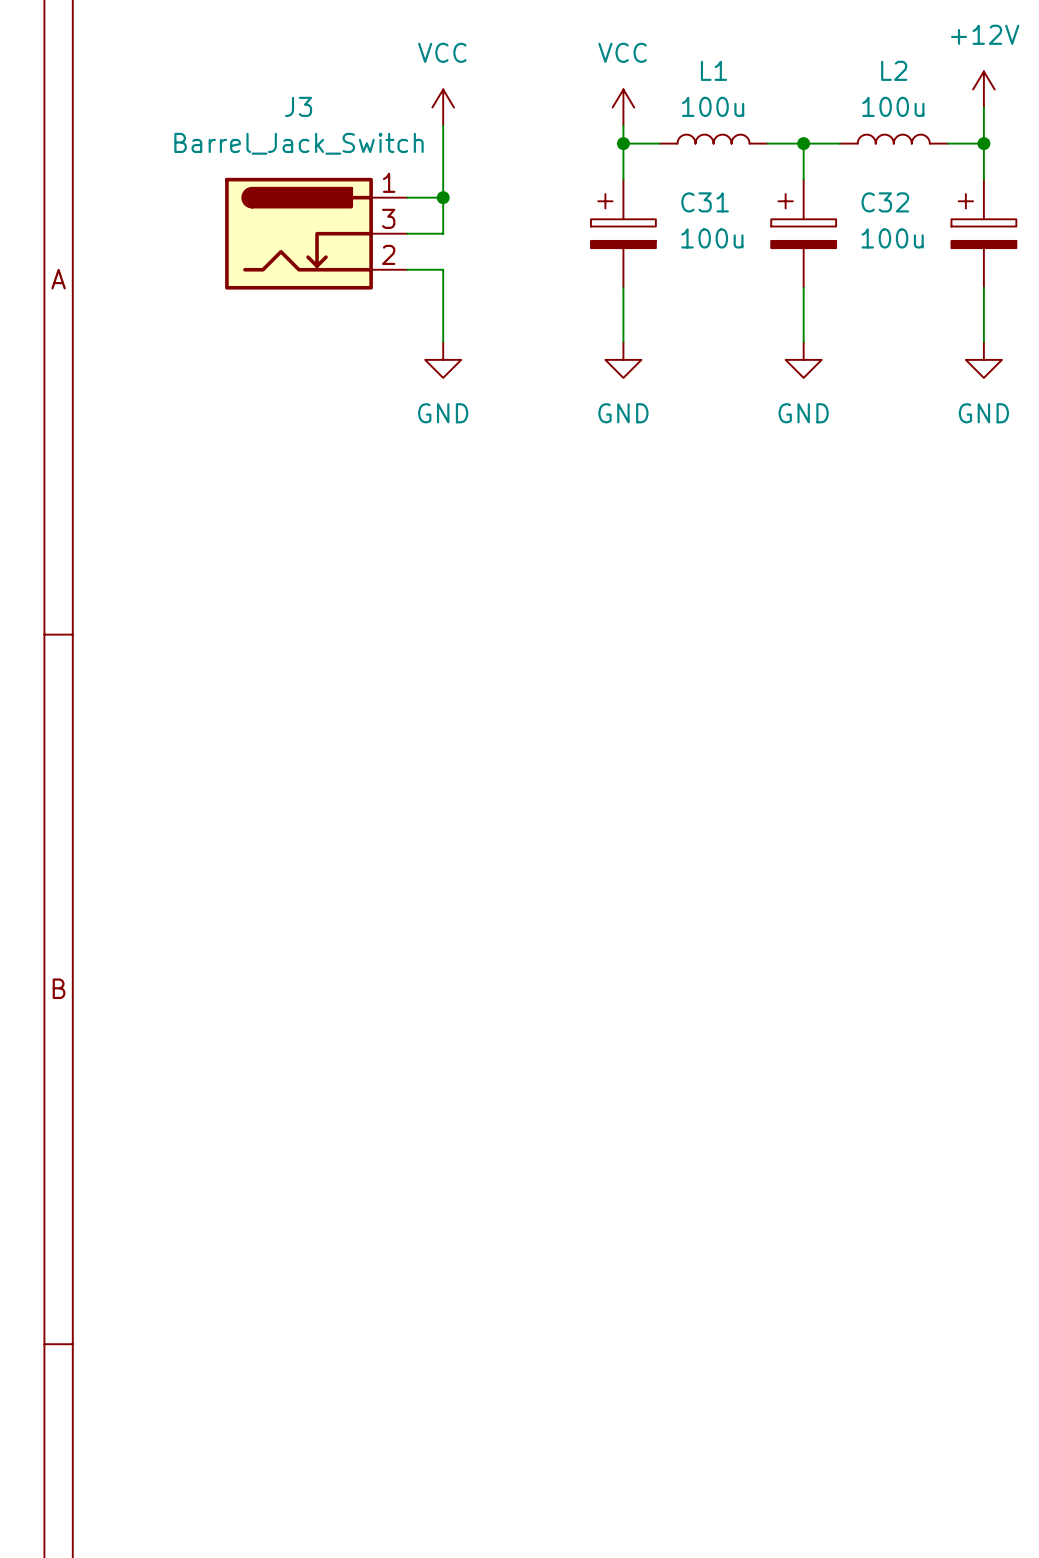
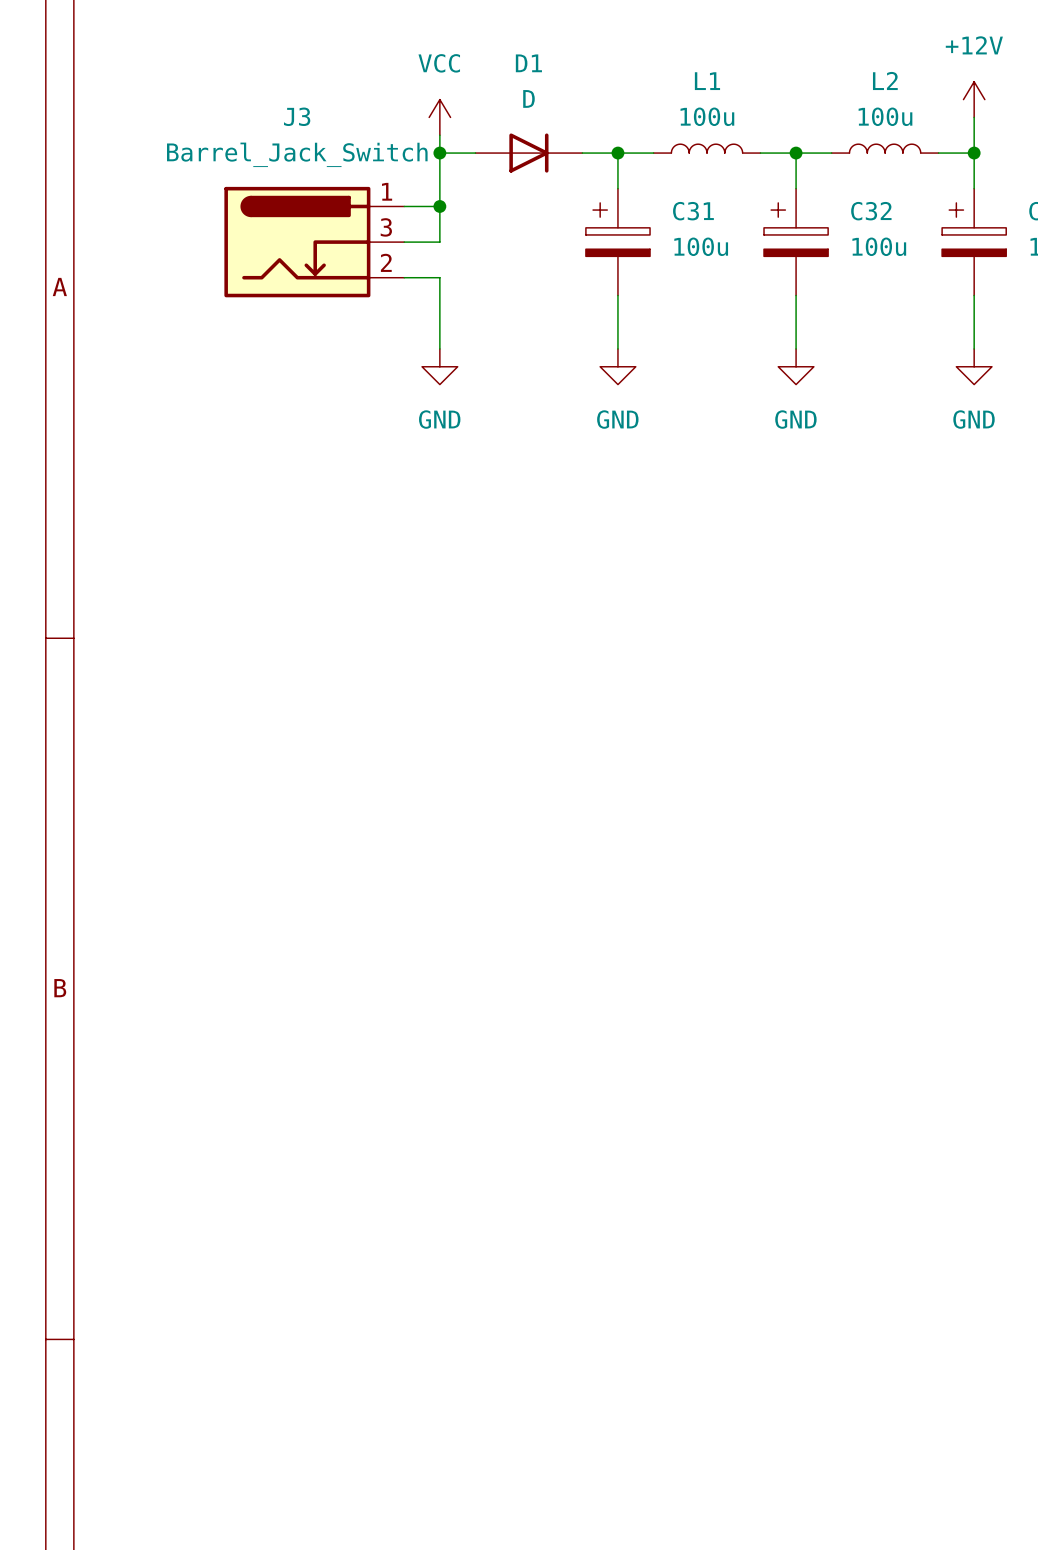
power symbol: VCC (623, 107) -> none
wire: (623, 125) (623, 143) -> (582, 153) (617, 153)
wire: none -> (439, 153) (475, 153)
junction: none -> (439, 153)
D1: none -> D (528, 153)

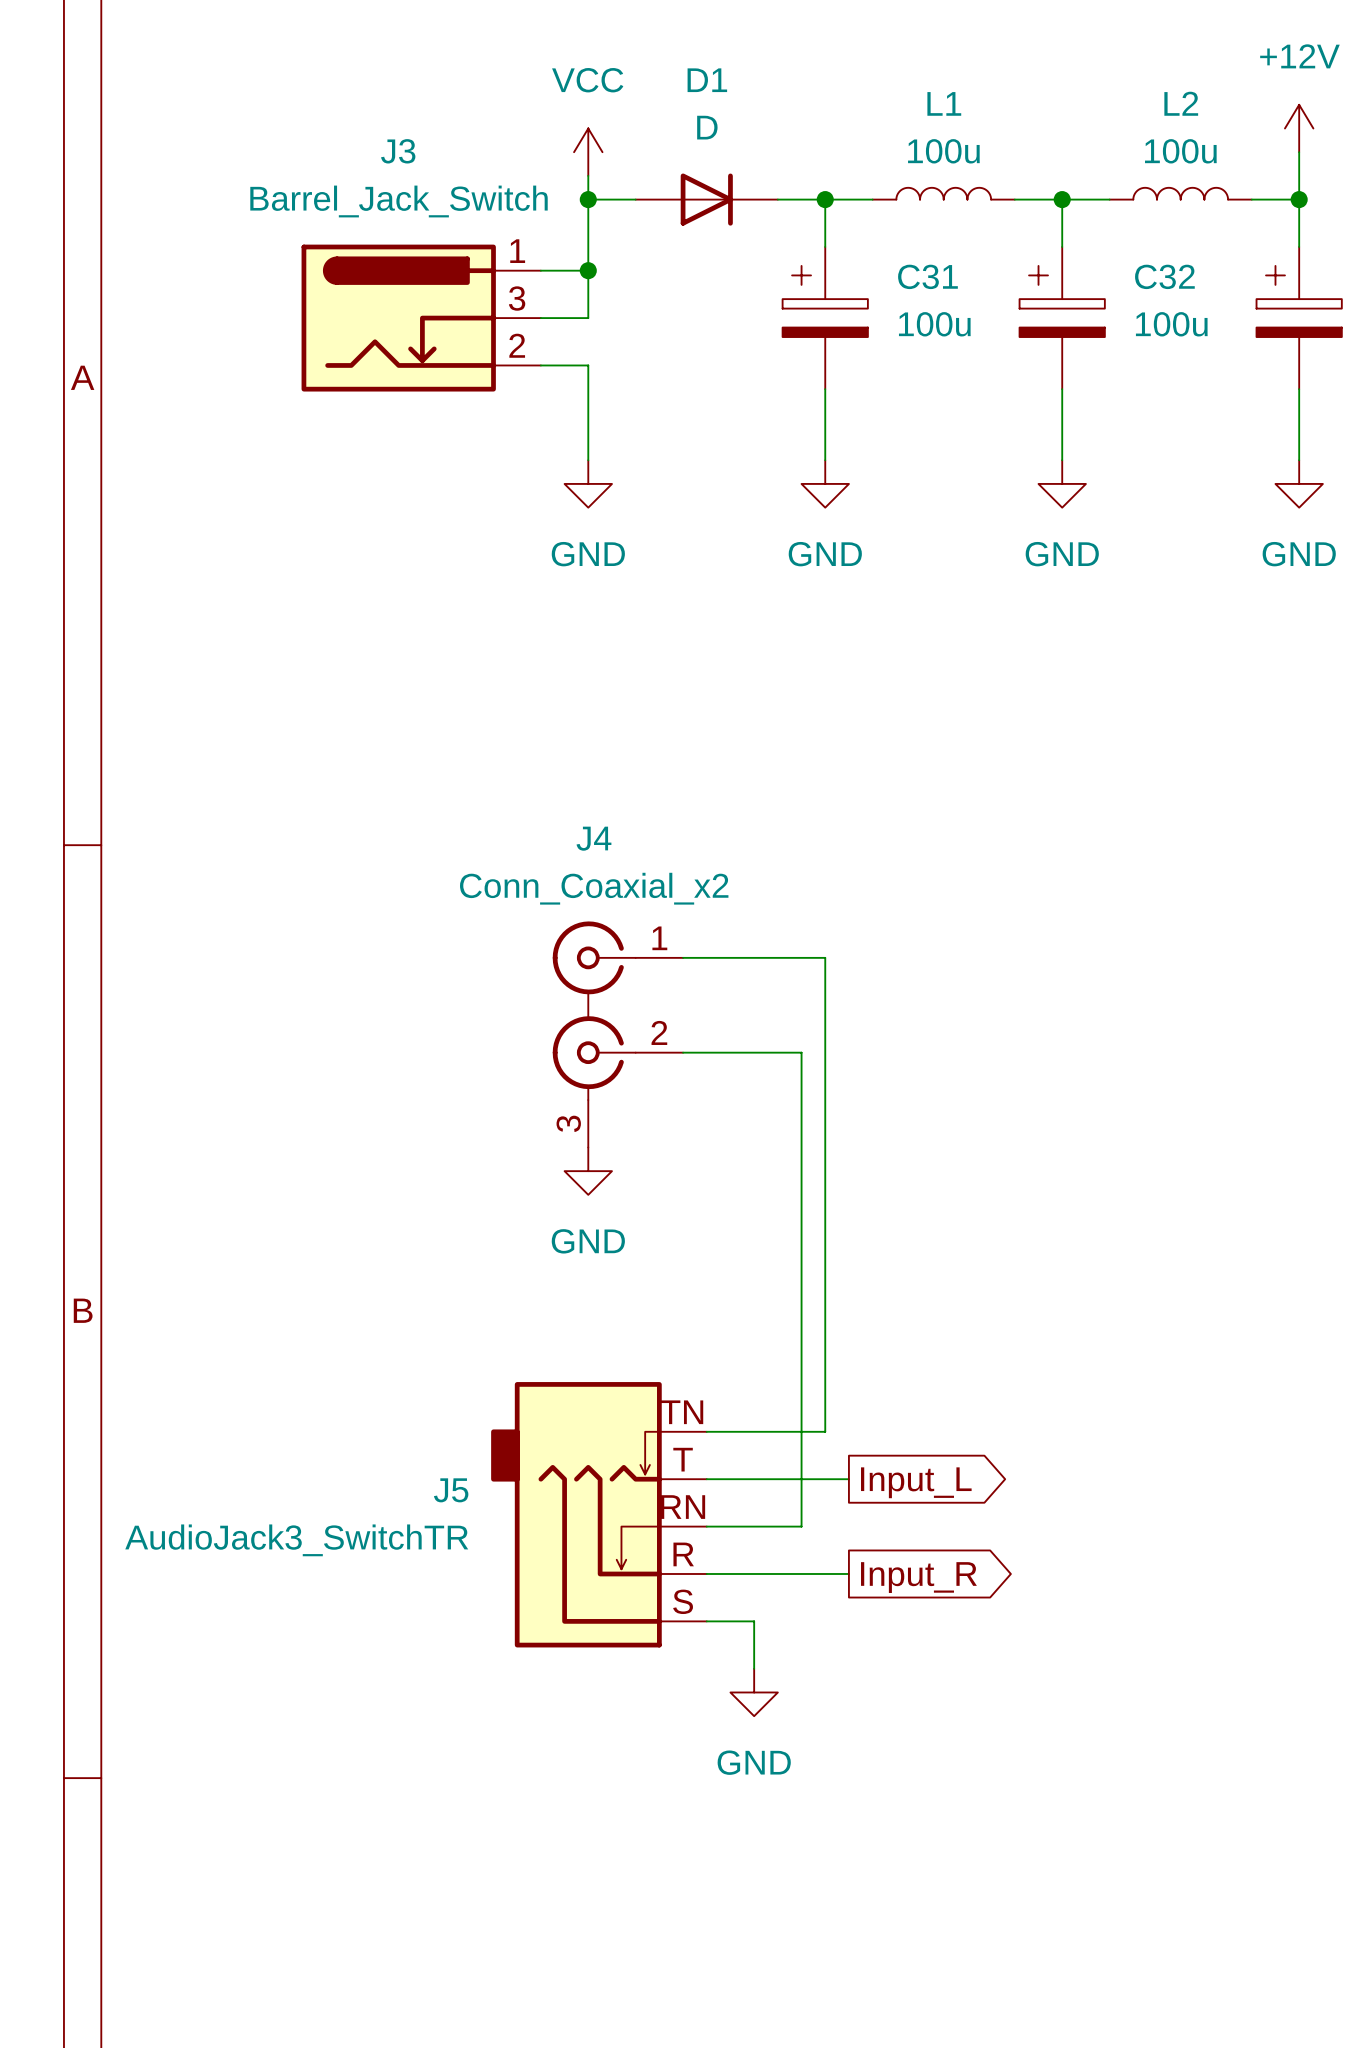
wire: none -> (683, 957) (825, 957) (825, 1431) (706, 1431)
J4: none -> Conn_Coaxial_x2 (617, 1034)
wire: none -> (683, 1052) (801, 1052) (801, 1526) (706, 1526)
power symbol: none -> GND (588, 1171)
wire: none -> (706, 1479) (848, 1479)
global label: none -> Input_L (916, 1482)
J5: none -> AudioJack3_SwitchTR (598, 1514)
wire: none -> (706, 1573) (848, 1573)
global label: none -> Input_R (918, 1577)
wire: none -> (706, 1621) (754, 1621) (754, 1668)
power symbol: none -> GND (754, 1692)

